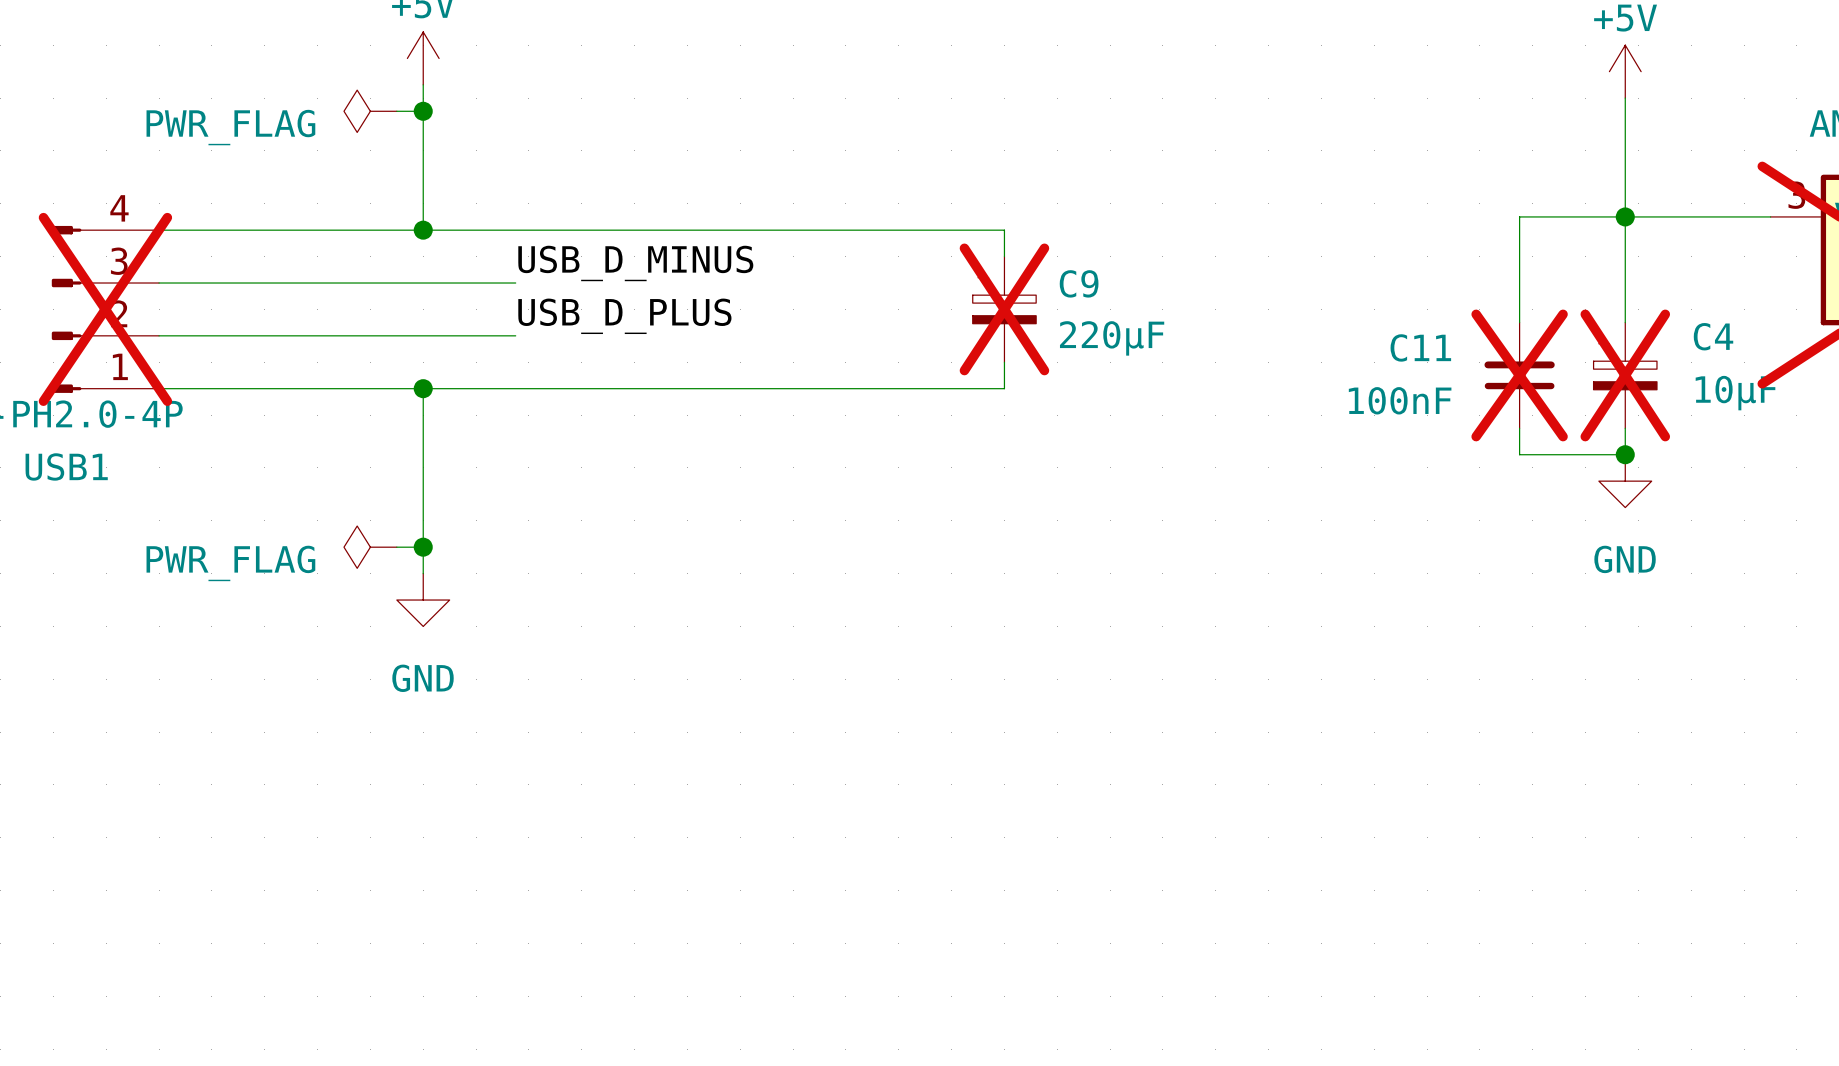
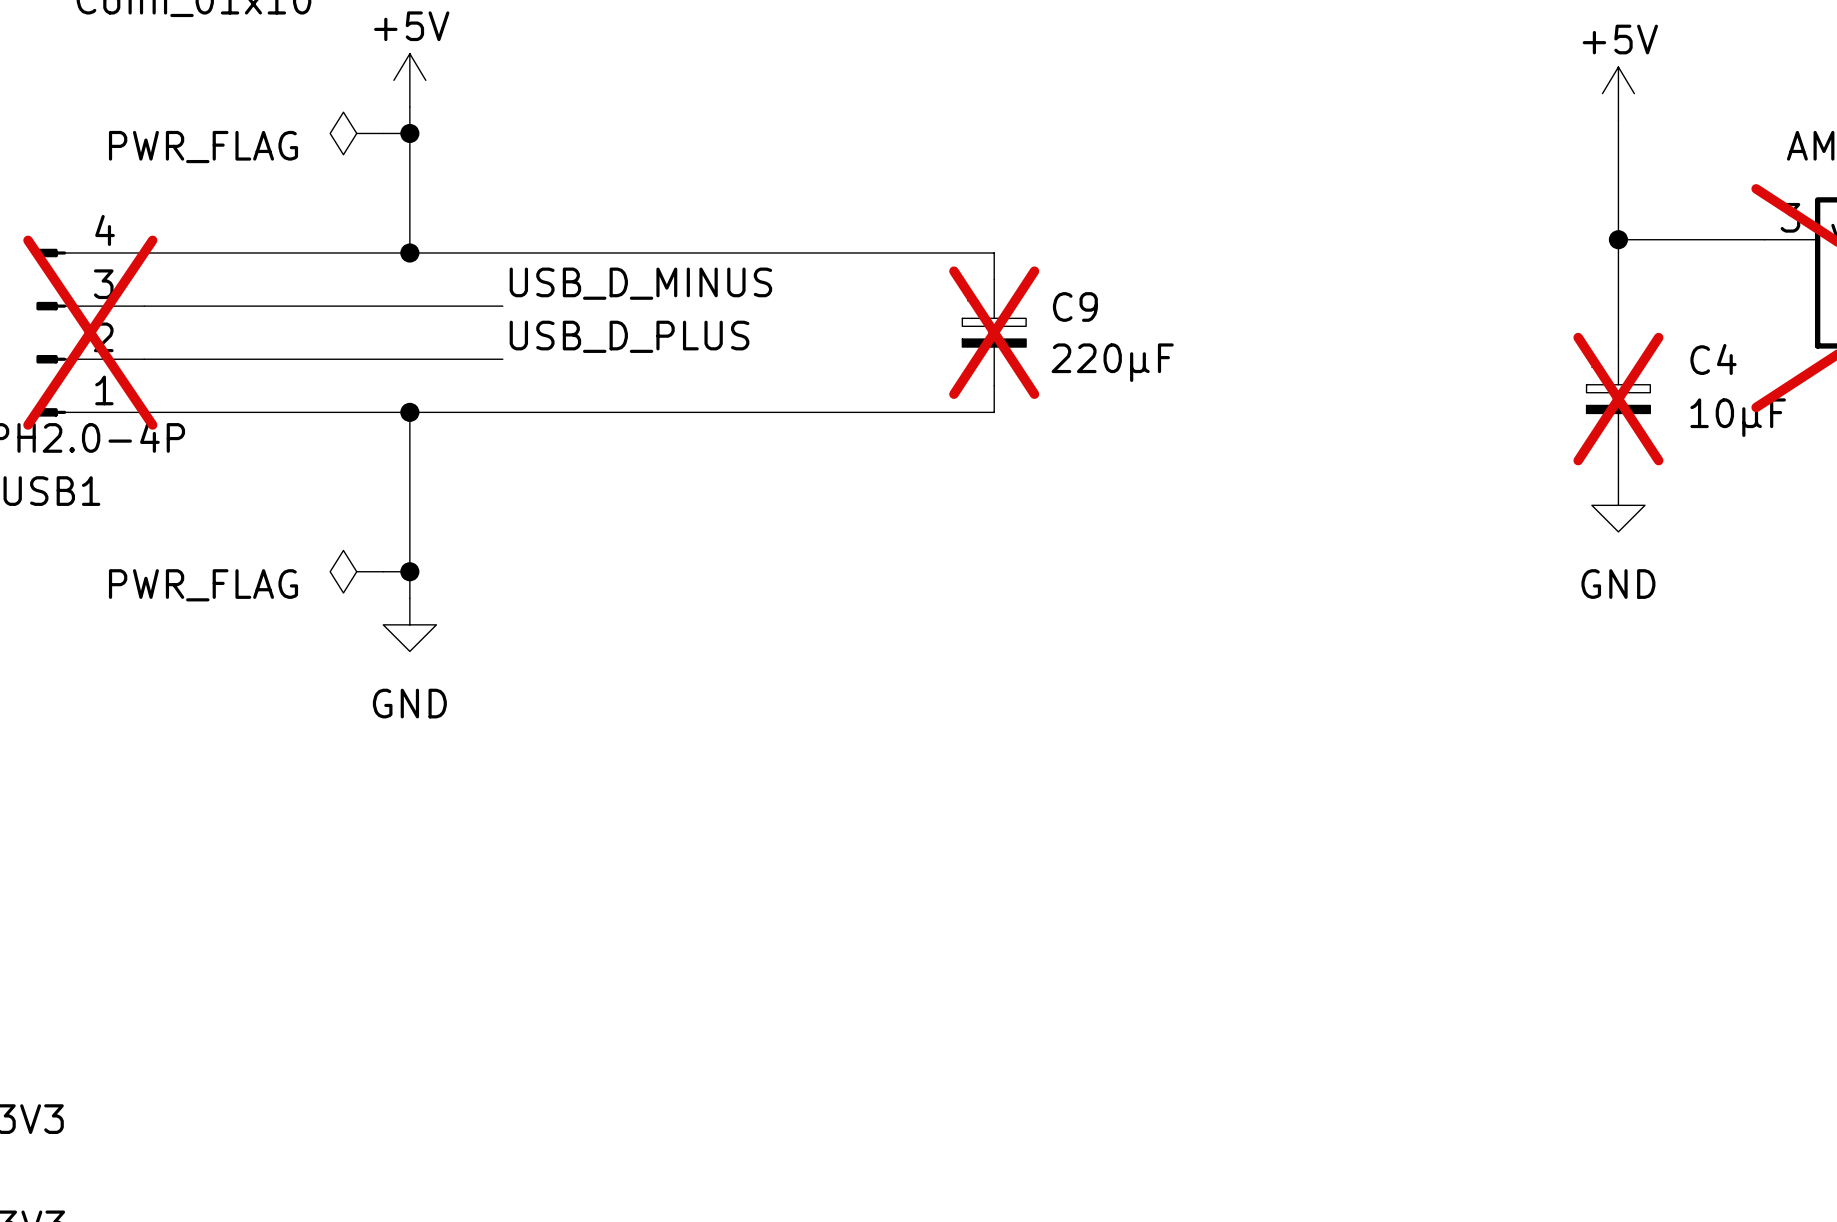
wire: (1625, 216) (1519, 216) (1519, 322) -> none
C11: 100nF (1519, 375) -> none
wire: (1519, 428) (1519, 454) (1625, 454) -> none
junction: (1625, 454) -> none

